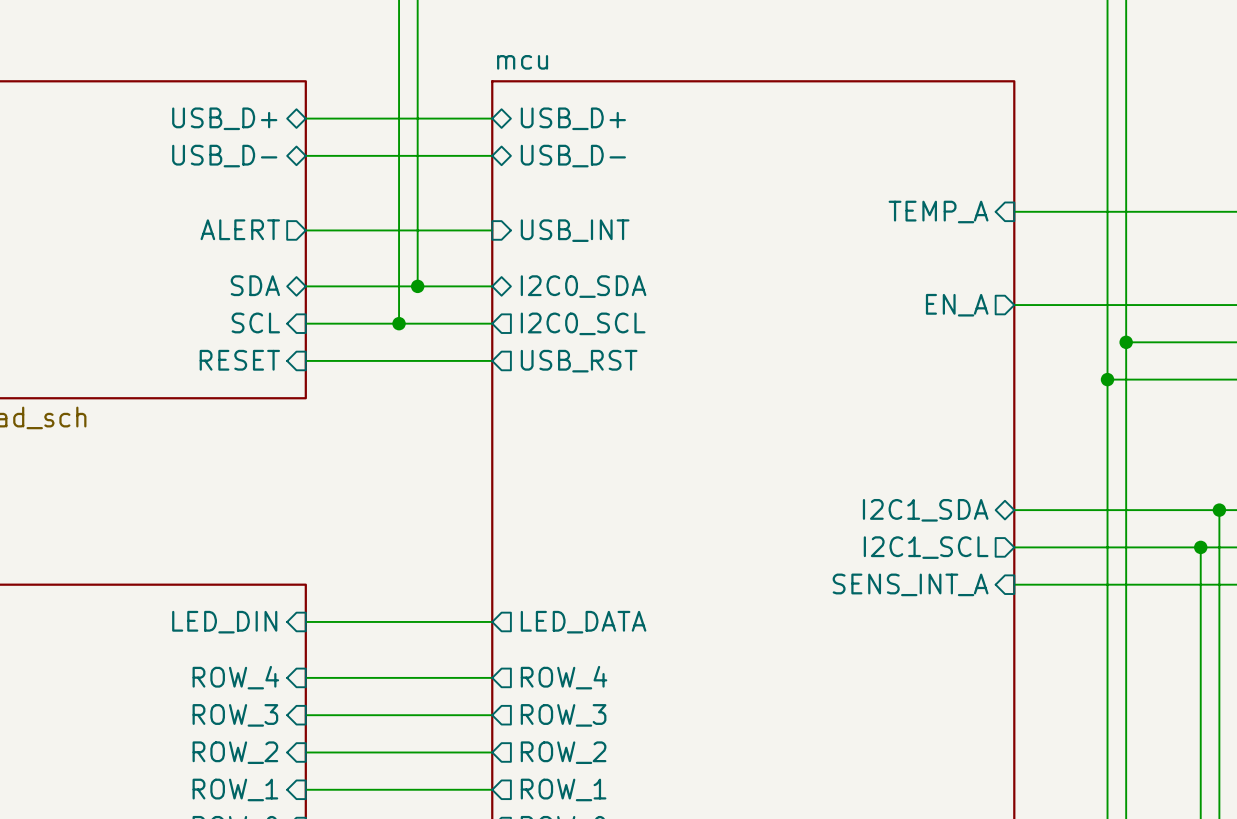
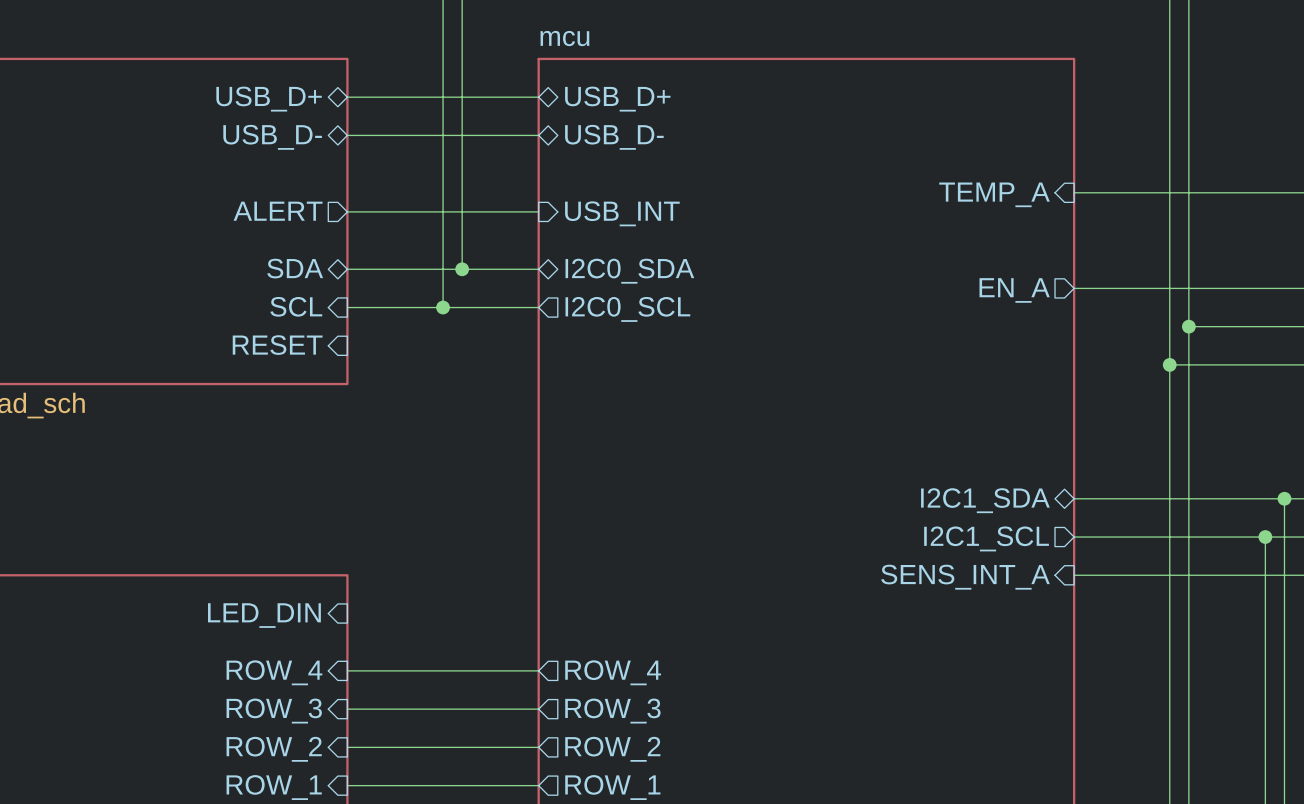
wire: (305, 360) (492, 360) -> none
sheet pin: USB_RST (579, 361) -> none
wire: (305, 621) (492, 621) -> none
sheet pin: LED_DATA (583, 622) -> none

